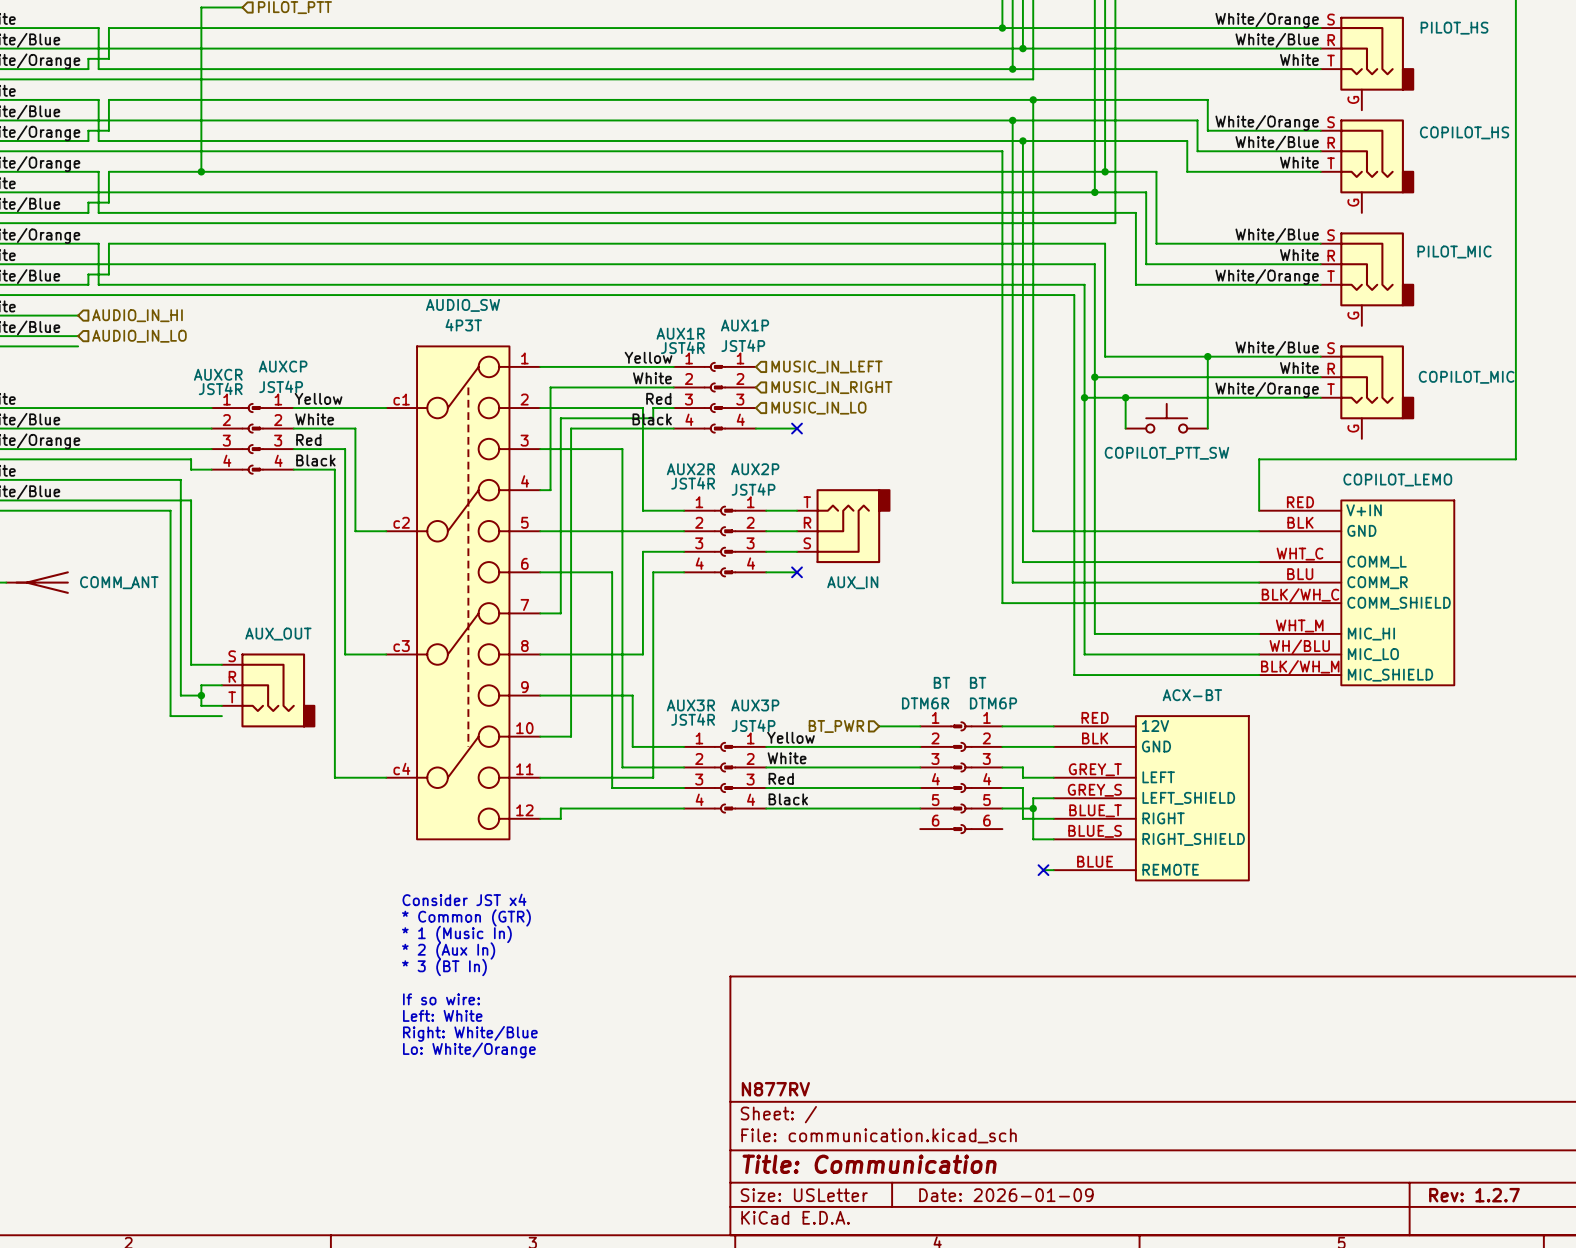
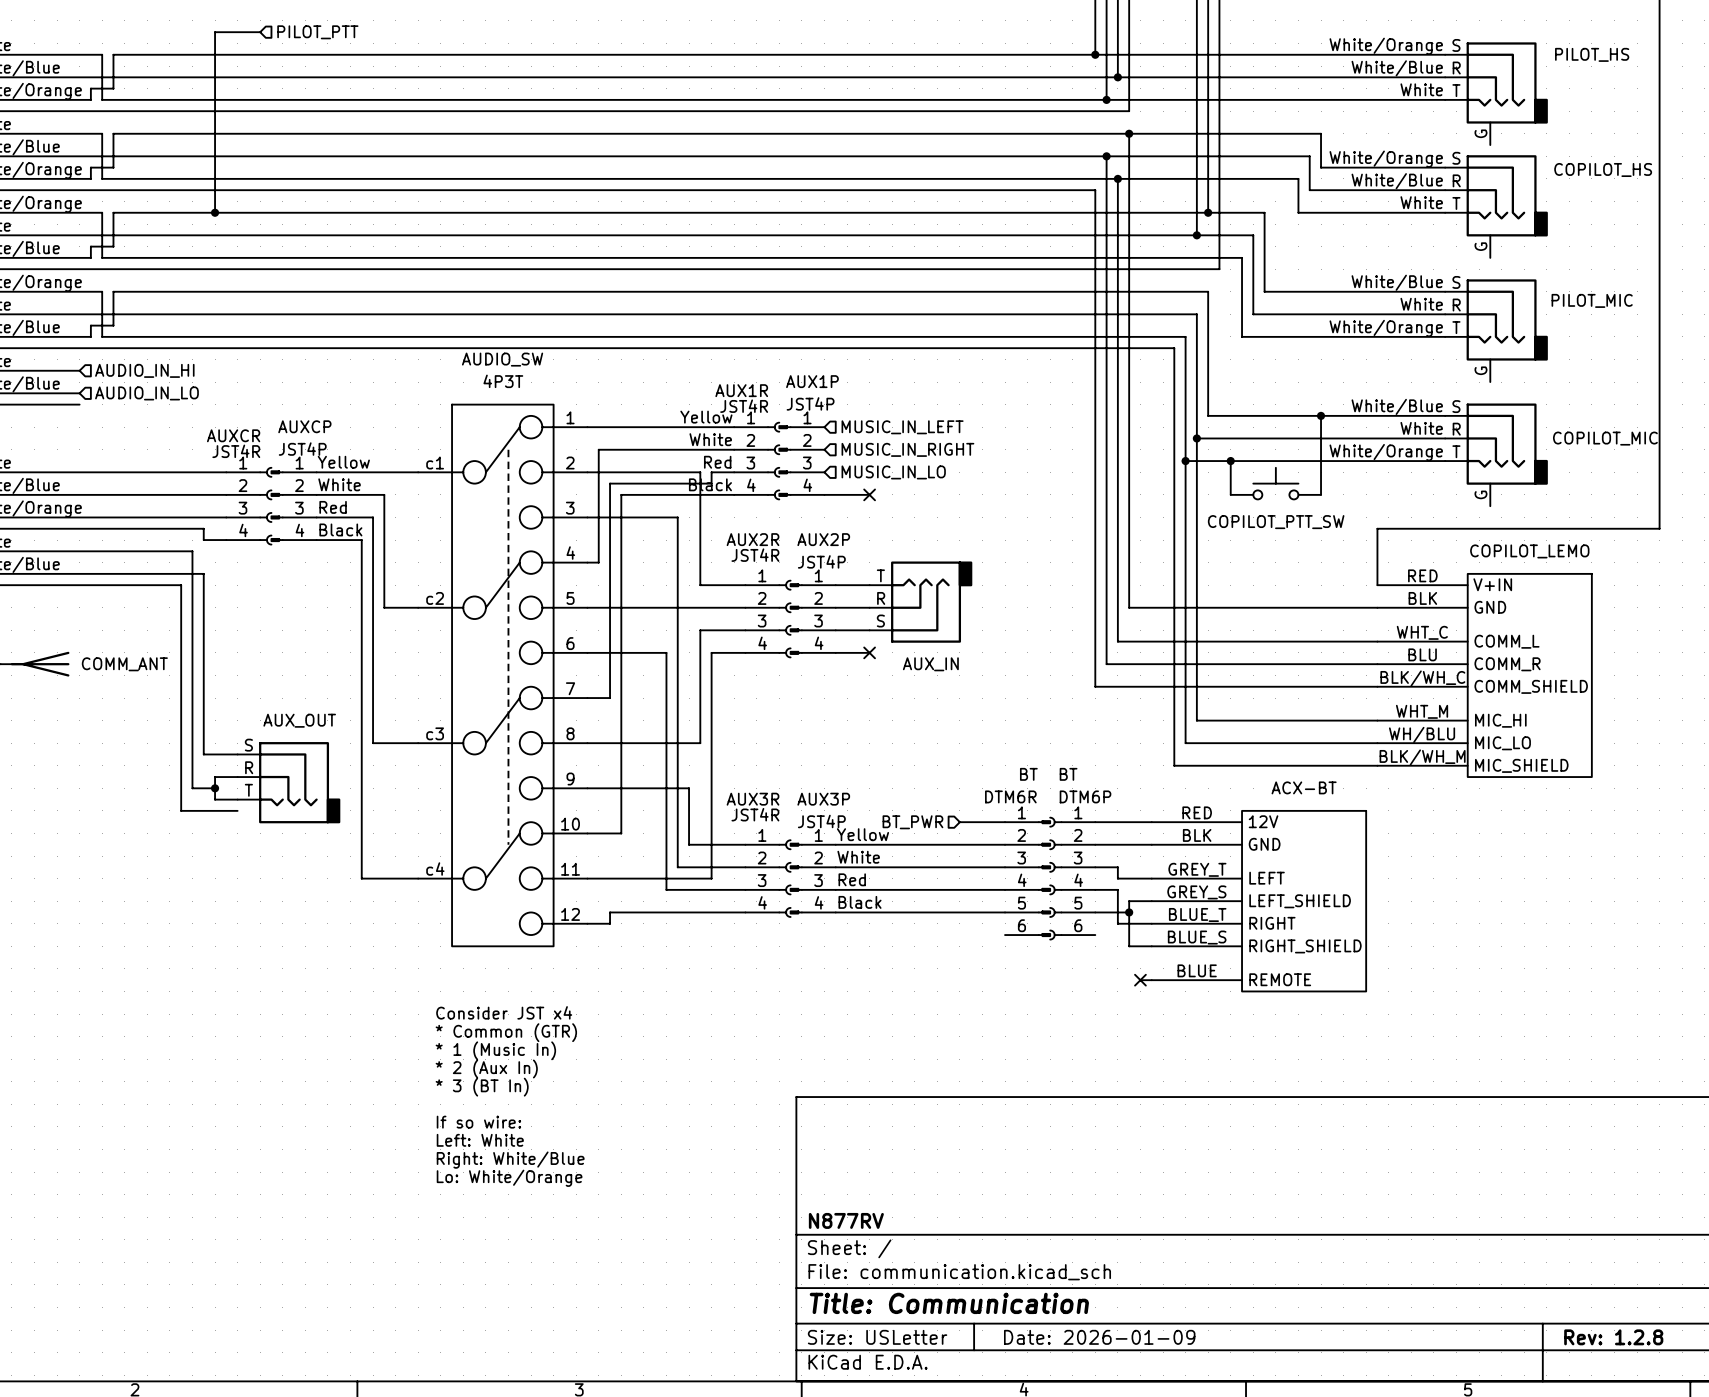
title block: Rev: 1.2.7 (1474, 1195) -> Rev: 1.2.8 (1613, 1337)

